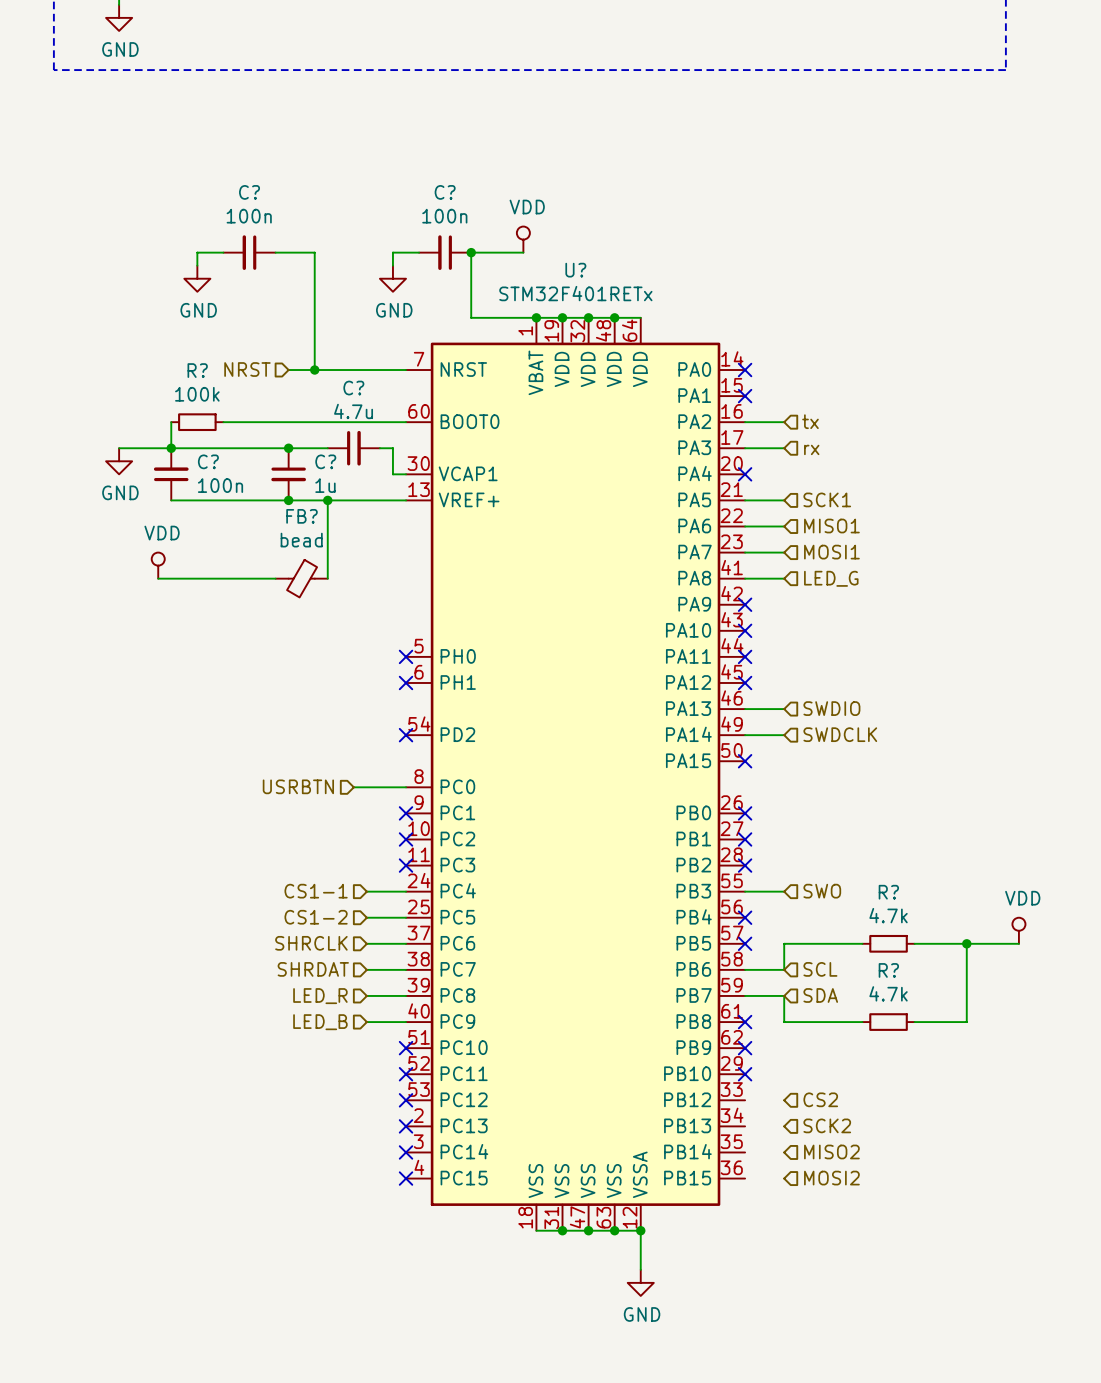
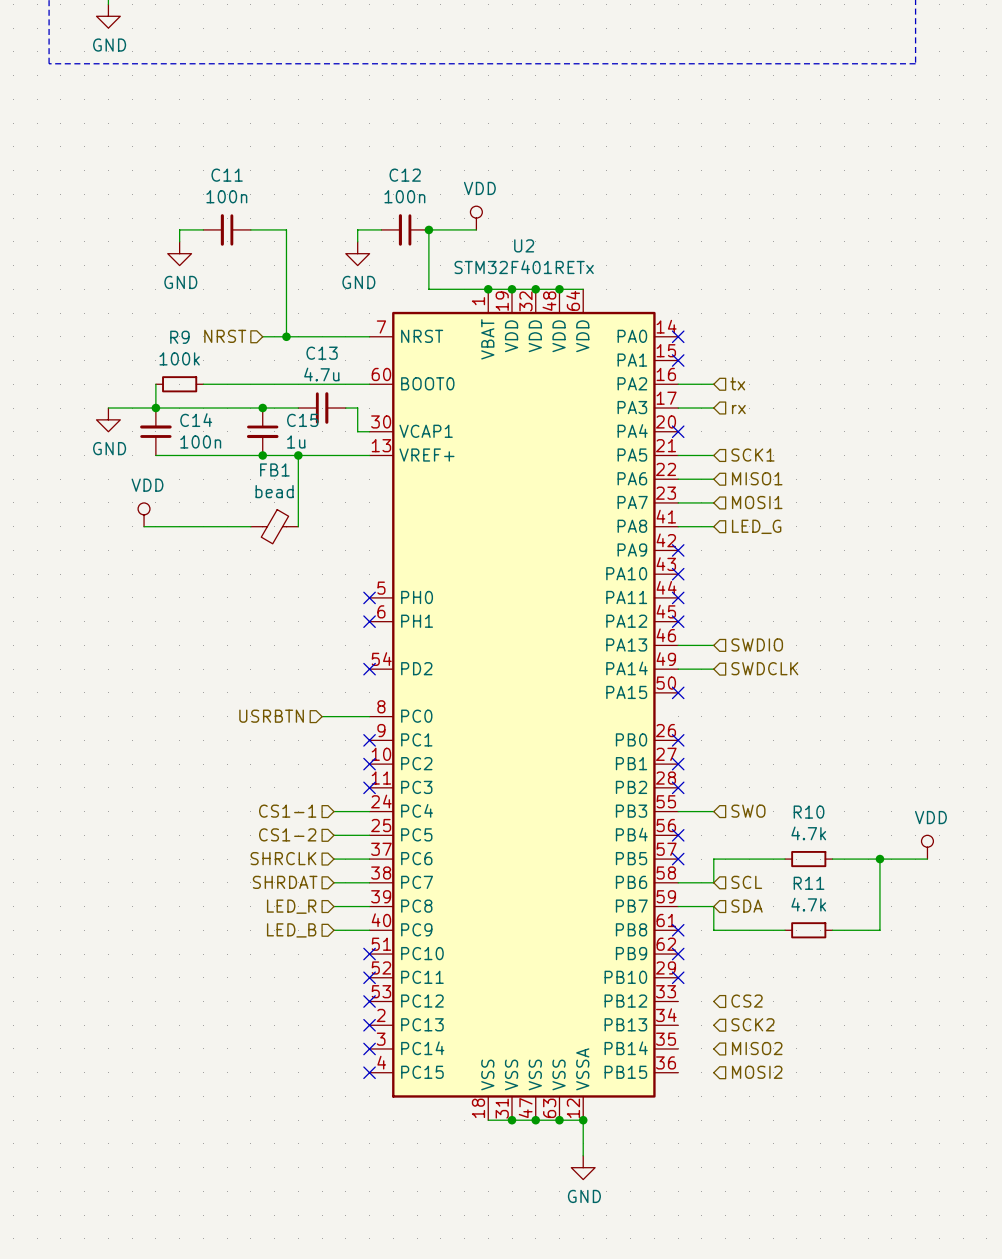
C? name: C? (249, 192) -> C11 (227, 175)
C? name: C? (445, 192) -> C12 (405, 175)
U? name: U? (575, 270) -> U2 (524, 245)
R? name: R? (197, 370) -> R9 (179, 337)
C? name: C? (353, 388) -> C13 (322, 353)
C? name: C? (208, 461) -> C14 (196, 420)
C? name: C? (325, 461) -> C15 (302, 420)
FB? name: FB? (301, 516) -> FB1 (274, 469)
R? name: R? (888, 892) -> R10 (809, 812)
R? name: R? (888, 970) -> R11 (809, 883)

